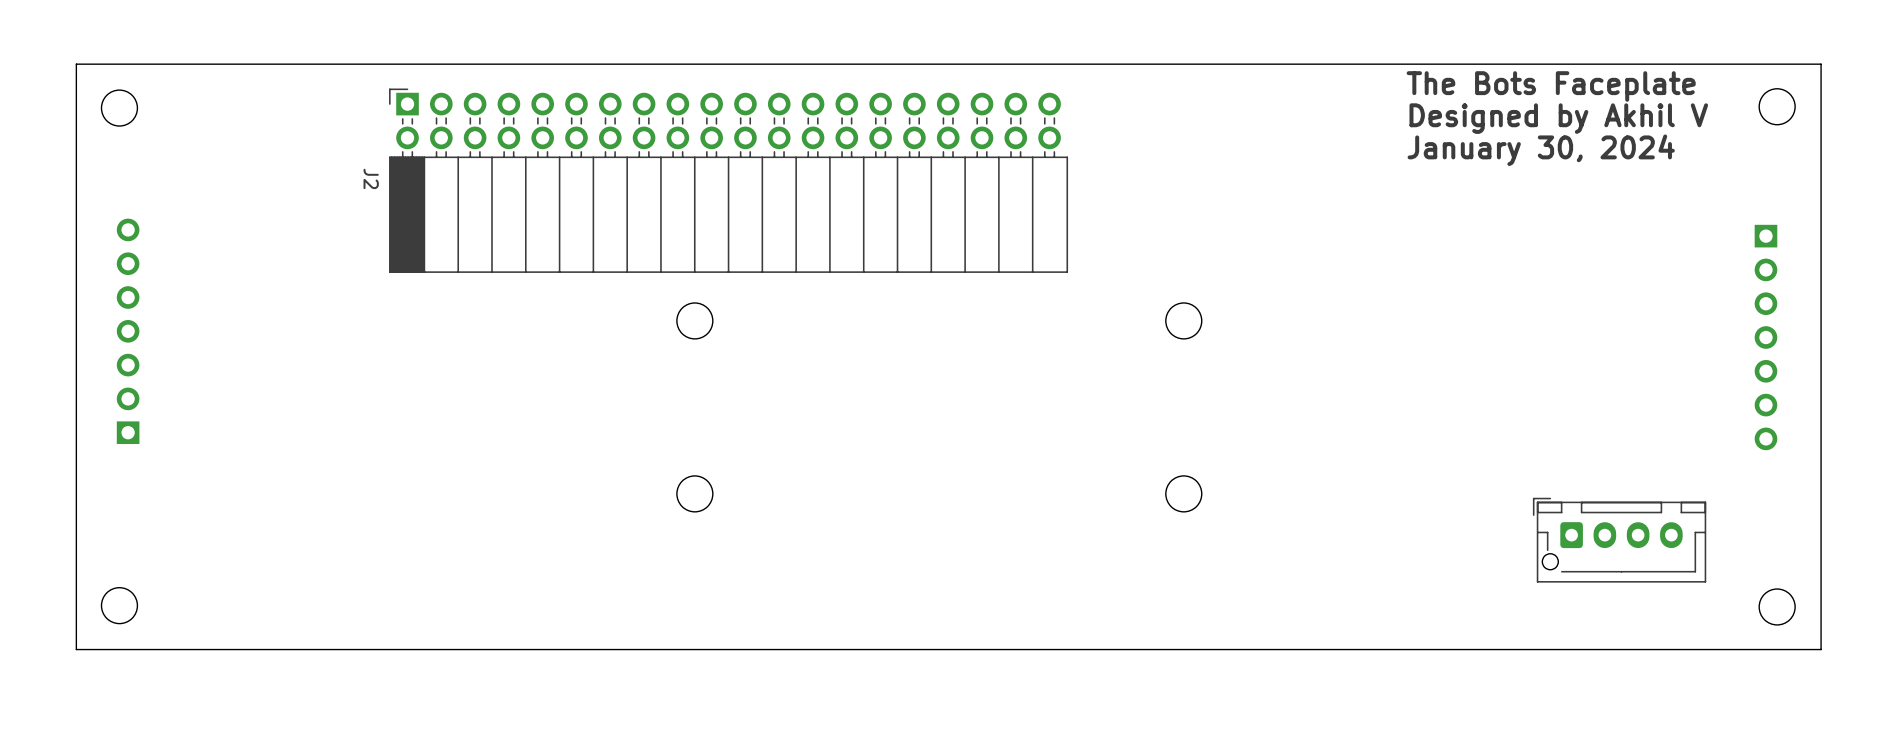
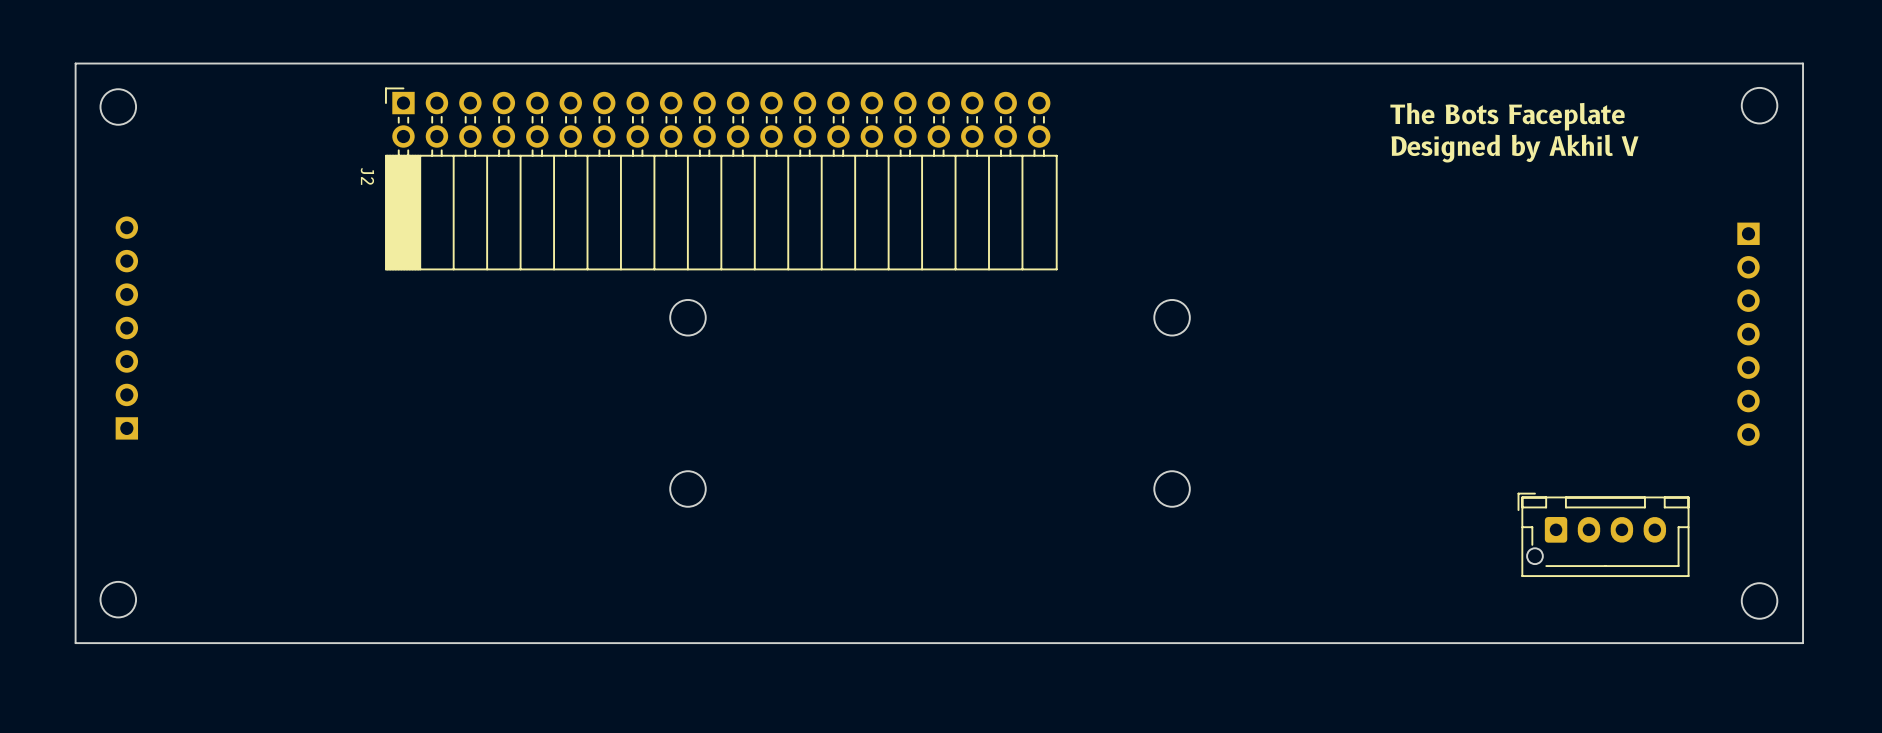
text: The Bots Faceplate (1551, 86) -> none
text: Designed by Akhil V (1558, 118) -> The Bots Faceplate (1507, 116)
text: January 30, 2024 (1541, 150) -> Designed by Akhil V (1515, 148)

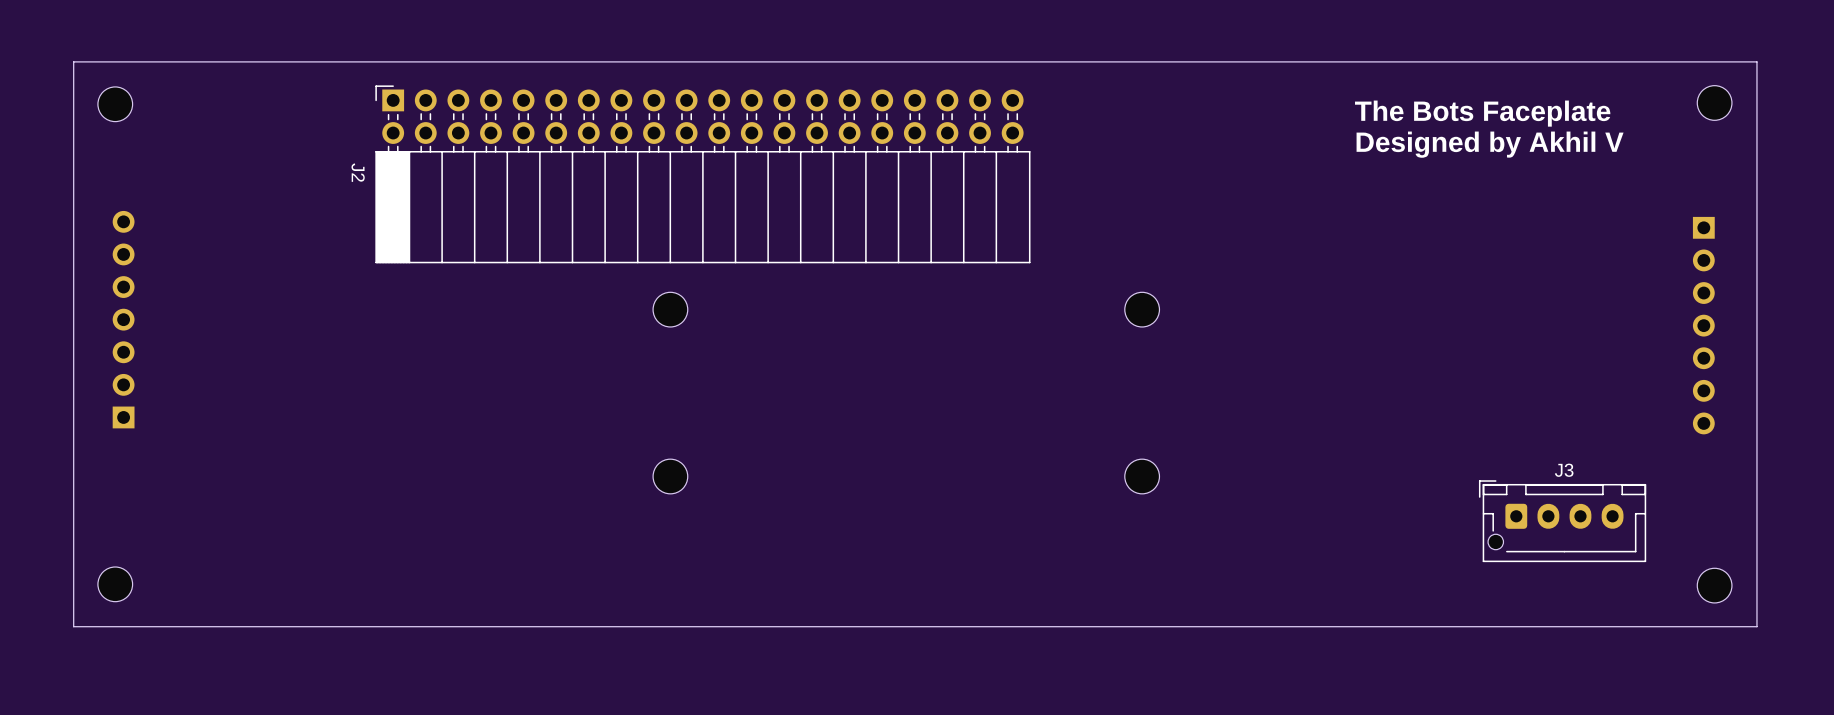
J3 name: none -> J3 (1564, 470)

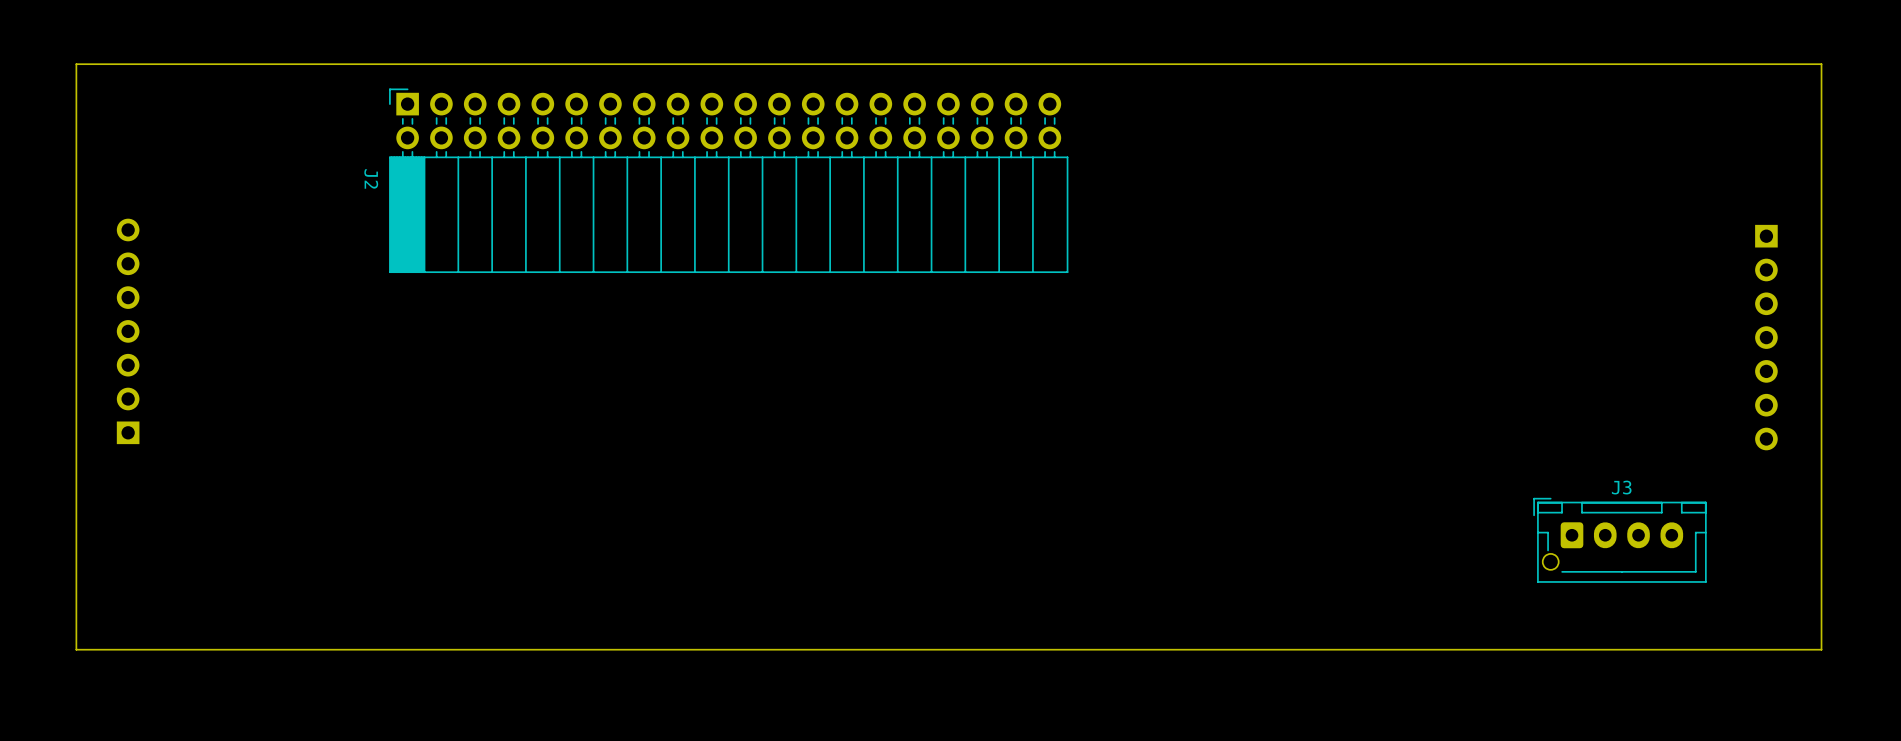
part: (1714, 102) -> none
part: (115, 104) -> none
text: The Bots Faceplate (1482, 113) -> none
text: Designed by Akhil V (1490, 144) -> none
part: (670, 309) -> none
part: (1142, 309) -> none
part: (670, 476) -> none
part: (1142, 476) -> none
part: (115, 584) -> none
part: (1714, 585) -> none

